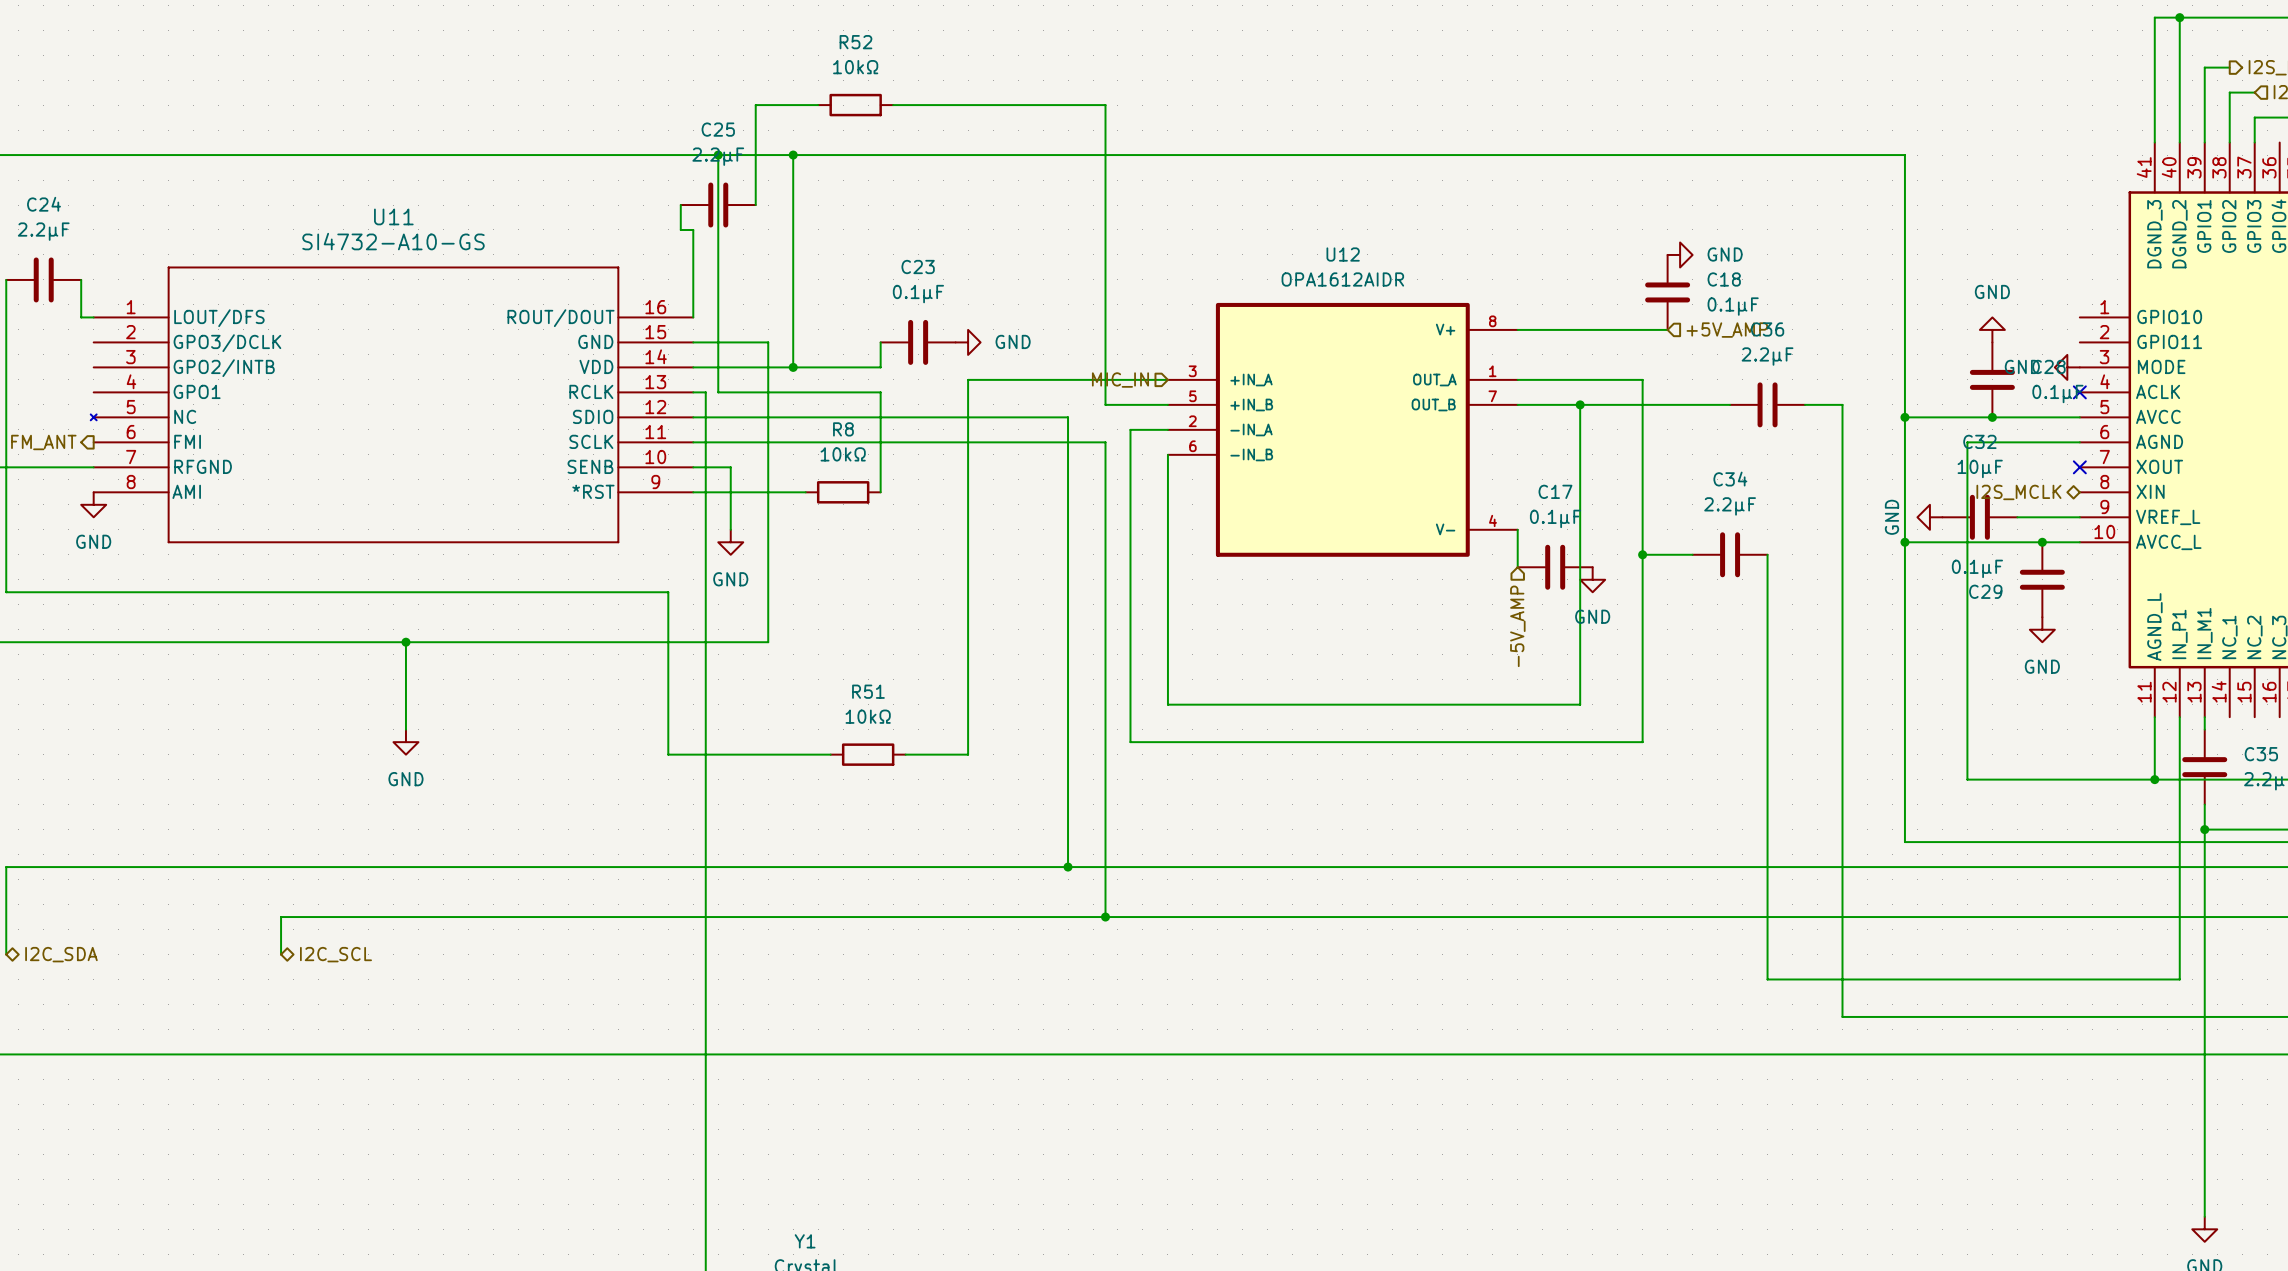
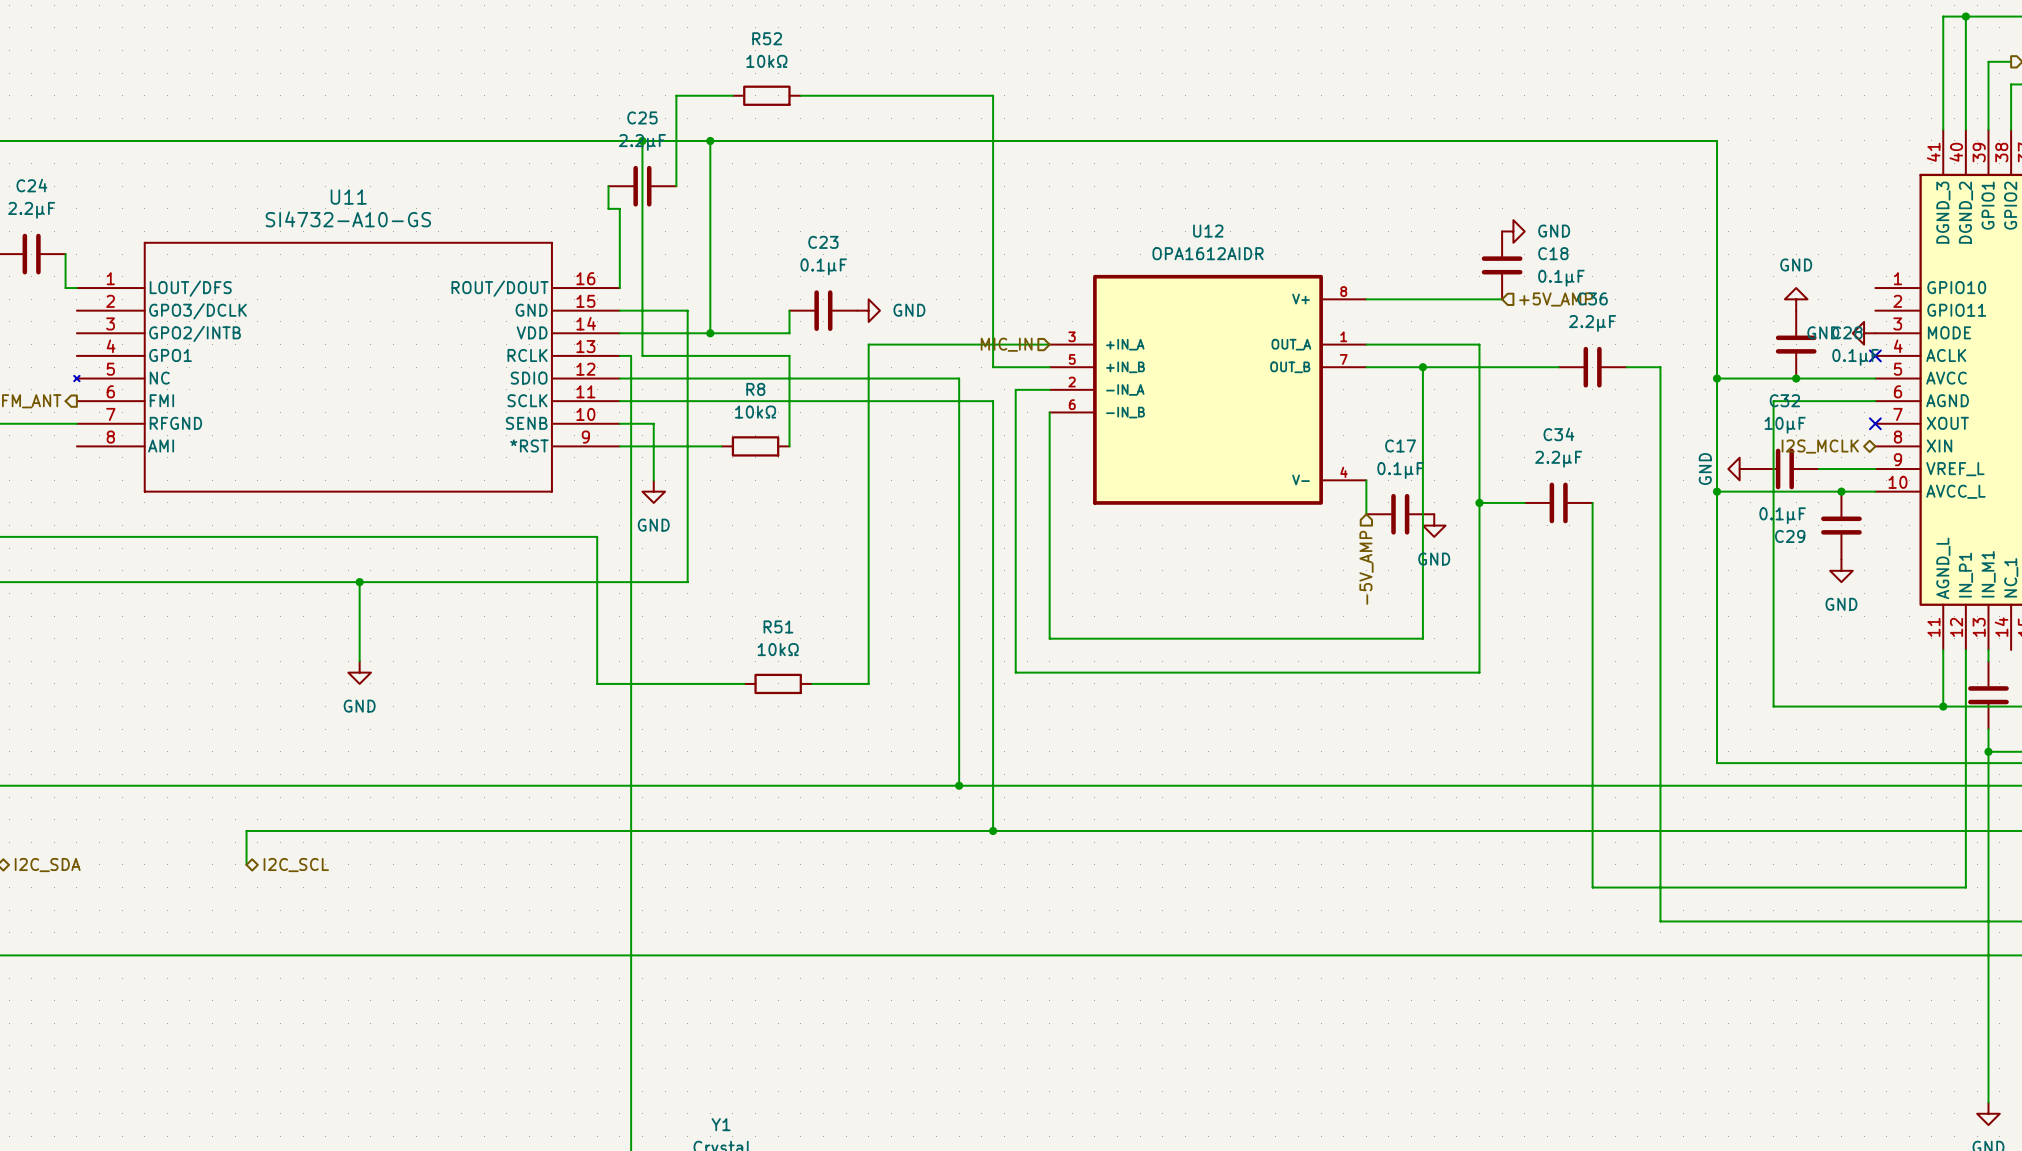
power symbol: GND (93, 504) -> none

